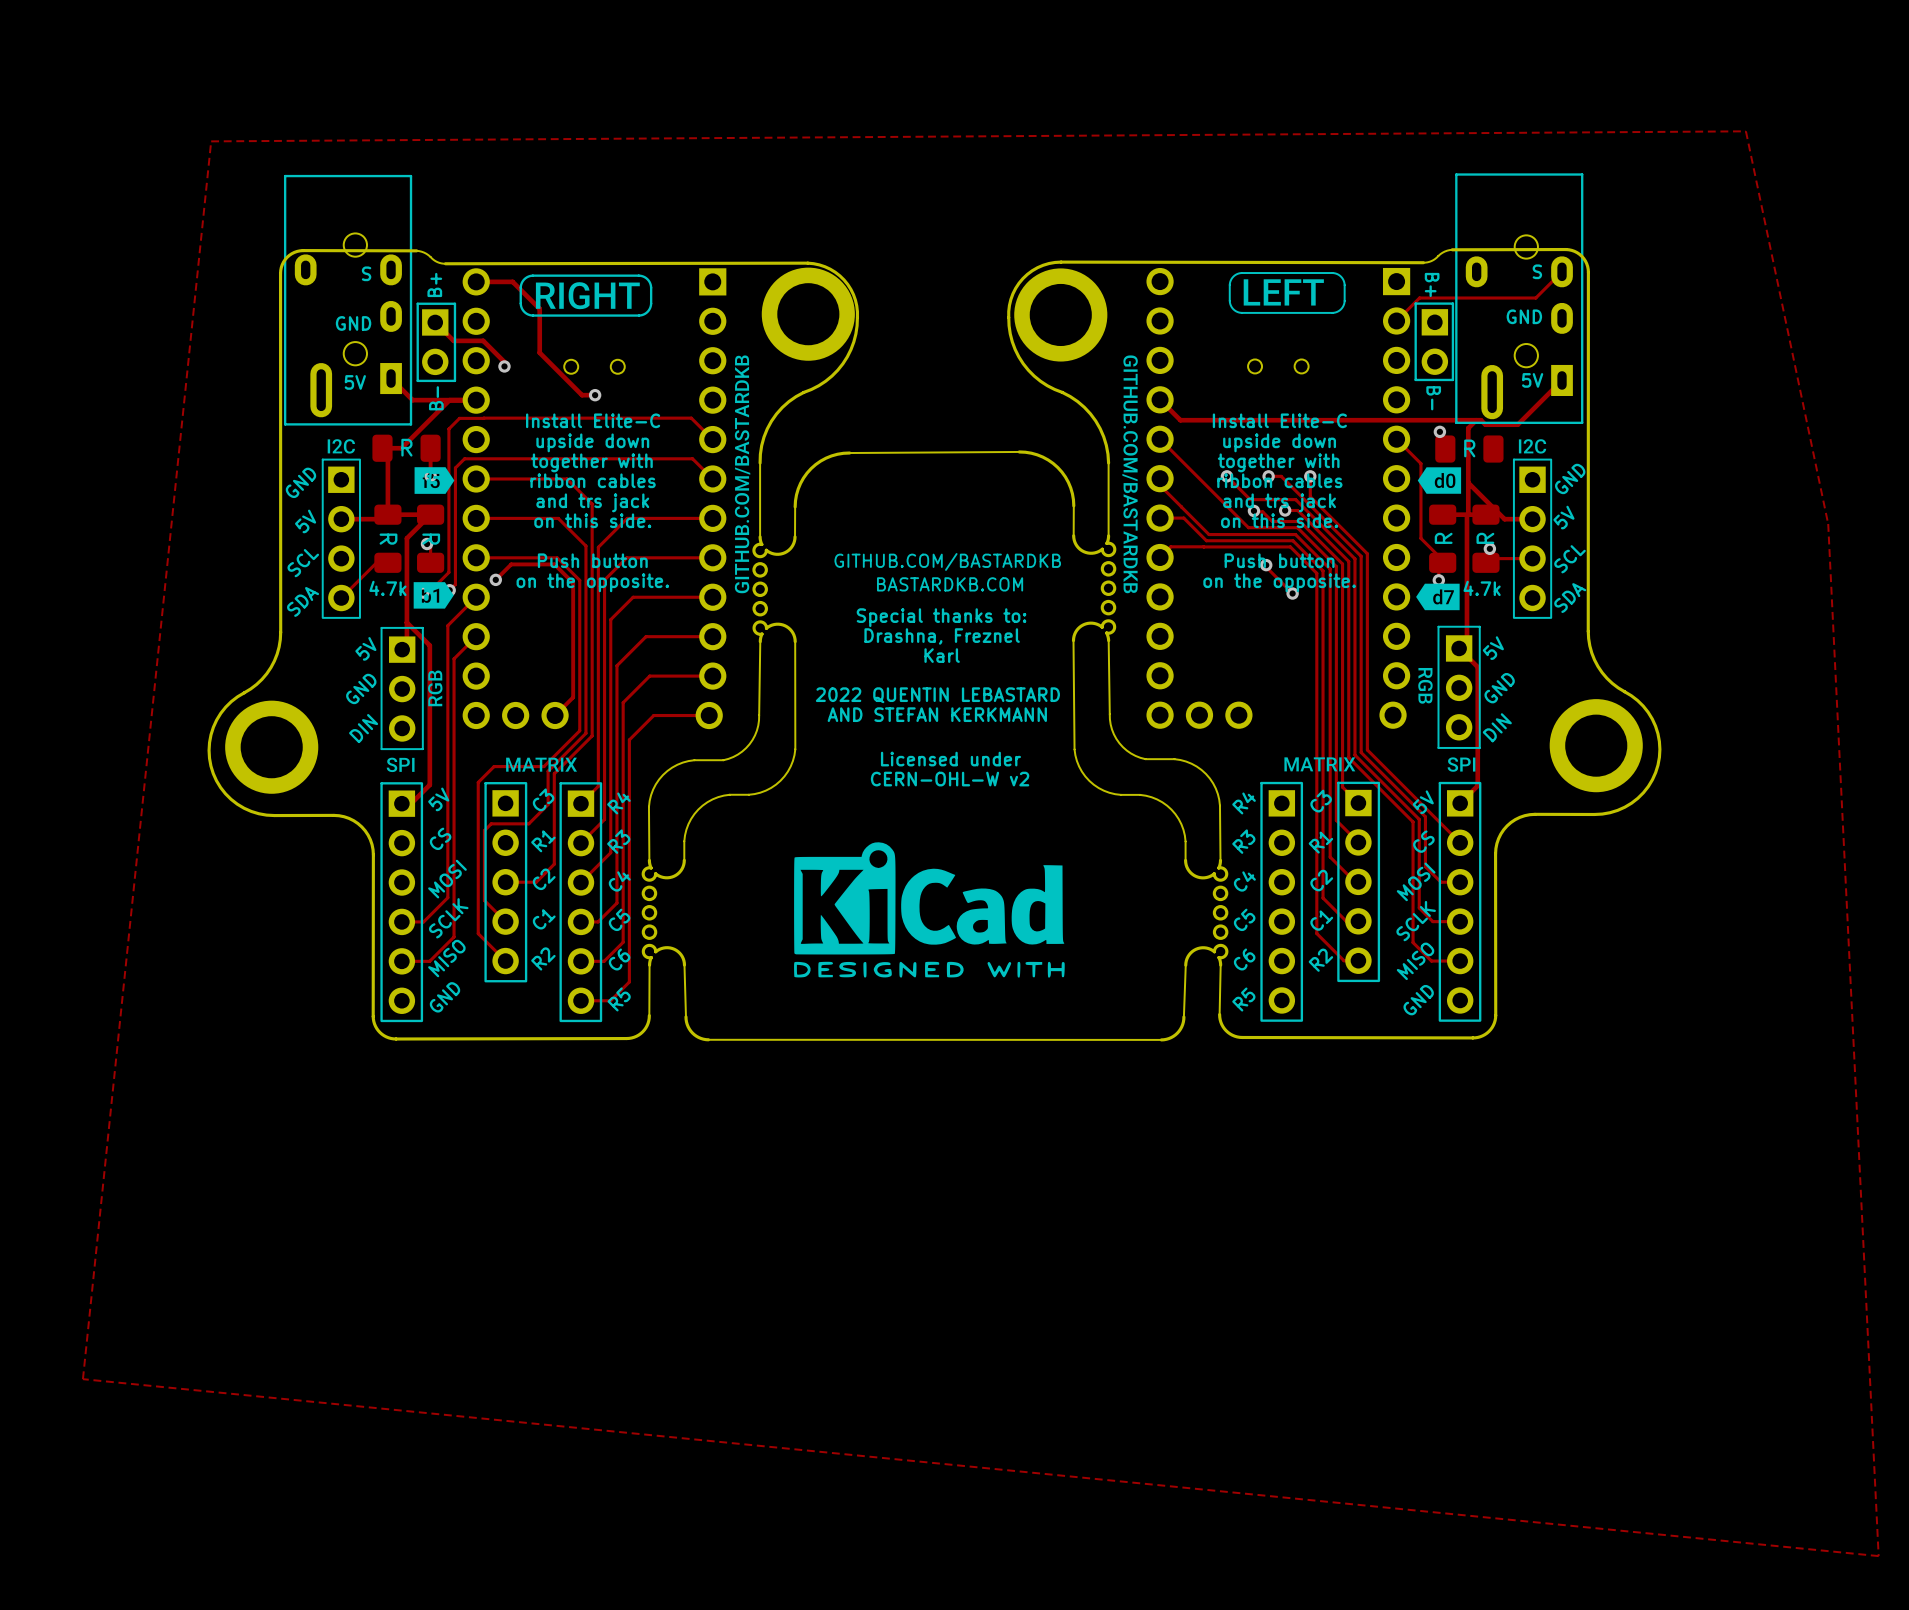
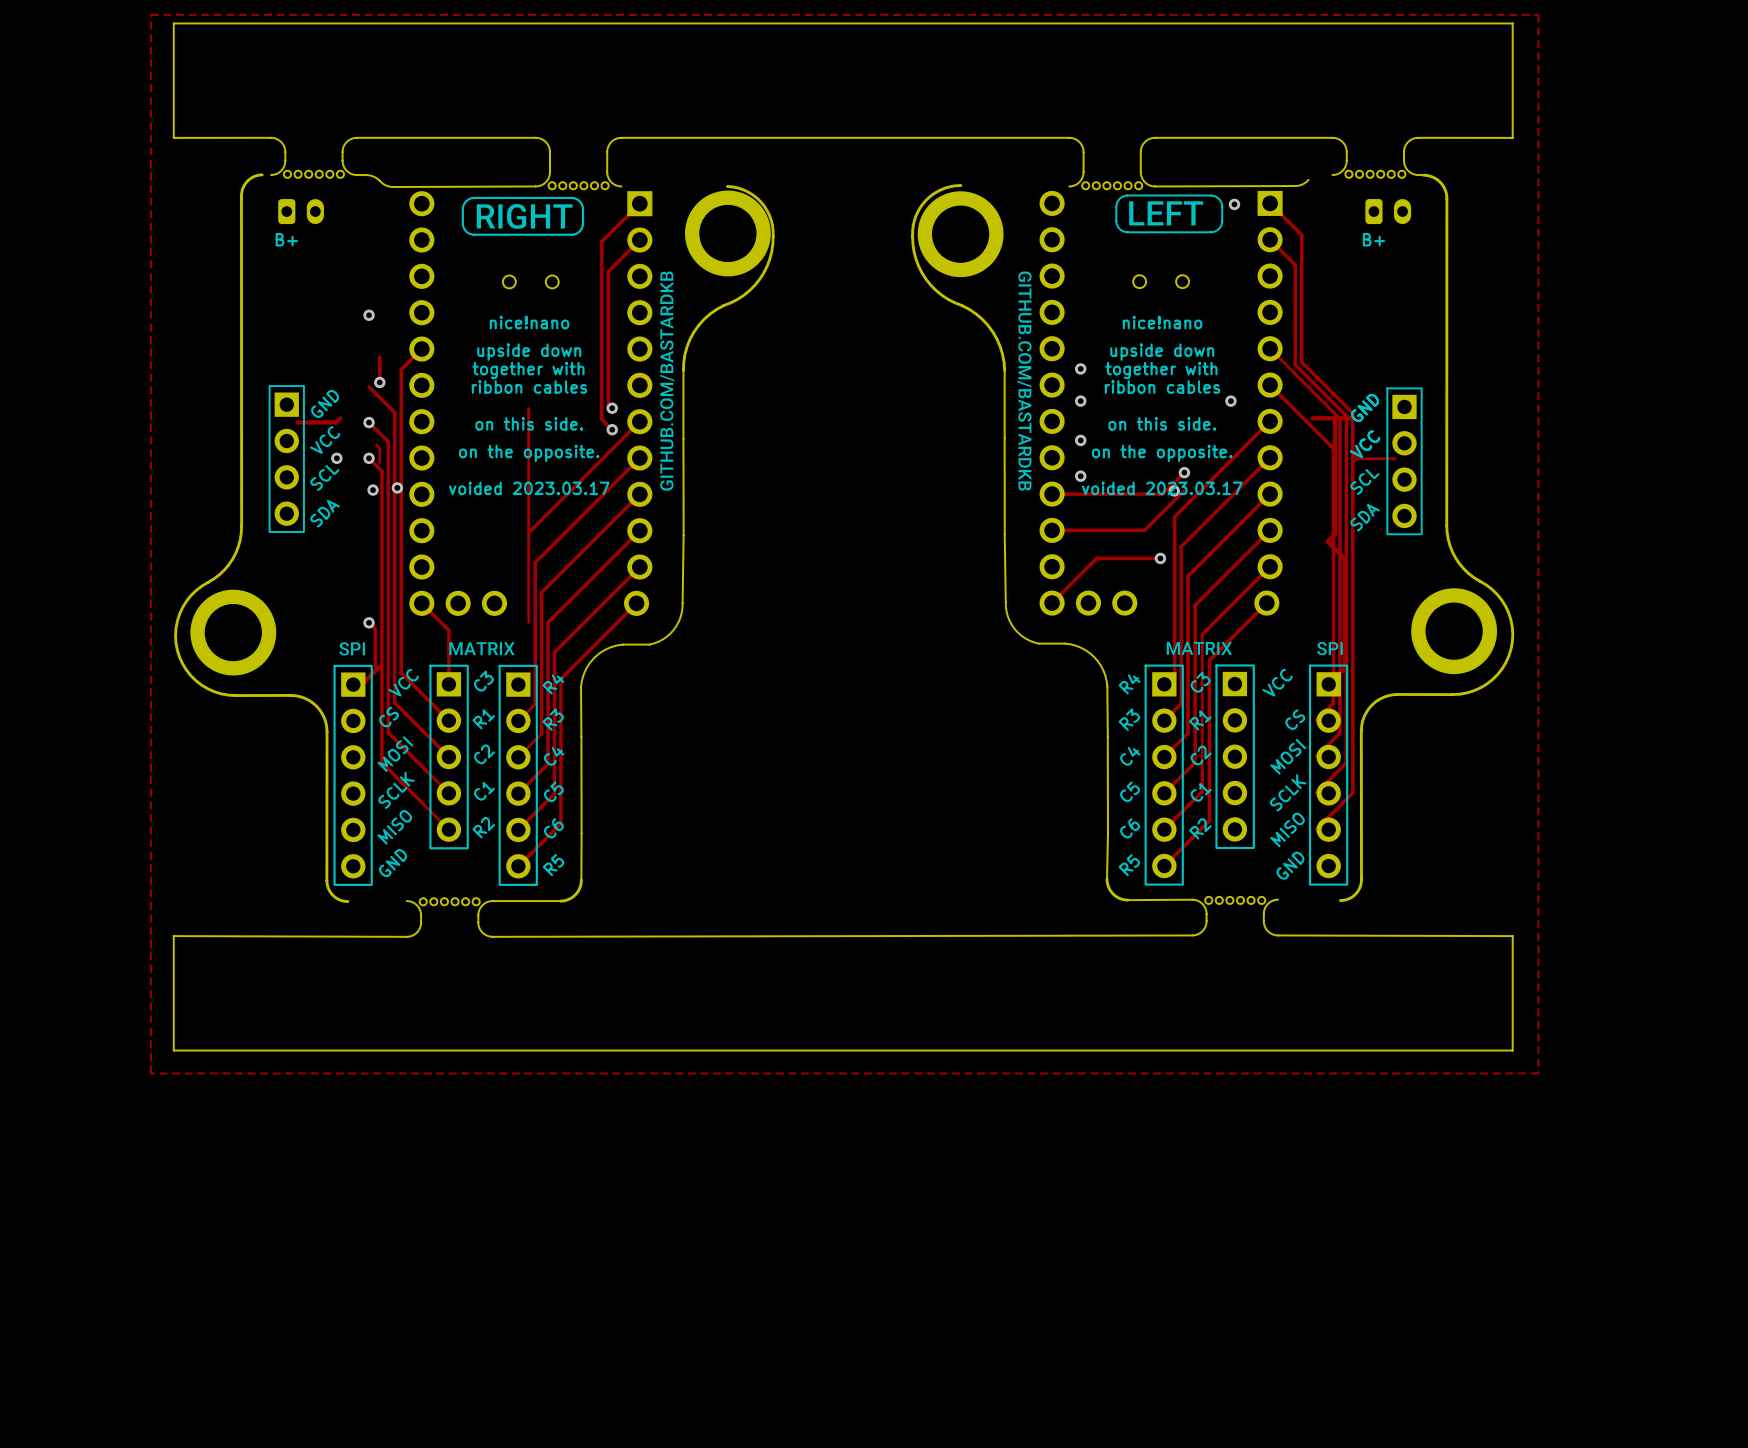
zone outline: (1745, 131) (1828, 523) (1878, 1556) (82, 1379) (211, 141) (1745, 131) -> (150, 14) (150, 1073) (1538, 1073) (1538, 14) (150, 14)
line: (1456, 174) (1456, 422) (1582, 422) (1582, 174) (1456, 174) -> none
line: (285, 176) (285, 424) (411, 424) (411, 176) (285, 176) -> none
board edge: none -> (271, 137) (173, 137) (173, 23) (1512, 23) (1512, 137) (1418, 137)
board edge: none -> (535, 137) (356, 137)
board edge: none -> (1069, 137) (621, 137)
board edge: none -> (1332, 137) (1155, 137)
part: none -> (313, 157)
part: none -> (1375, 157)
part: none -> (578, 163)
part: none -> (1112, 163)
board edge: (303, 250) (416, 250) -> (356, 175) (366, 175)
board edge: (1438, 255) (1452, 249) (1568, 249) (1577, 252) (1583, 258) (1587, 266) (1588, 276) -> (1418, 175) (1429, 176) (1437, 180) (1445, 189) (1446, 198)
board edge: (1061, 262) (1423, 262) -> (1155, 186) (1294, 186)
board edge: (807, 263) (445, 263) -> (535, 186) (393, 187)
text: S (1537, 271) -> none
track: (1562, 271) (1535, 298) (1419, 298) (1396, 320) -> (1316, 792) (1346, 762) (1346, 415) (1295, 364) (1295, 264) (1270, 239)
text: S (366, 273) -> none
track: (476, 281) (512, 281) (539, 308) (539, 352) (582, 395) (595, 395) -> none
track: none -> (639, 203) (601, 241) (601, 419) (612, 429)
track: none -> (1270, 203) (1301, 235) (1301, 362) (1352, 413) (1352, 792) (1316, 828)
via: none -> (1234, 204)
text rotation: 0° (434, 284) -> 90° clockwise (286, 239)
text position: B+ (434, 284) -> B+ (286, 239)
text rotation: 0° (1432, 284) -> 90° counterclockwise (1373, 239)
text position: B+ (1432, 284) -> B+ (1373, 239)
part: none -> (301, 211)
part: none -> (1388, 211)
line: (417, 303) (454, 303) (454, 380) (417, 380) (417, 303) -> none
line: (1415, 303) (1452, 303) (1452, 379) (1415, 379) (1415, 303) -> none
text: GND (1524, 316) -> none
track: none -> (639, 240) (608, 271) (608, 404) (612, 408)
track: (435, 322) (453, 340) (483, 340) (504, 362) (504, 366) -> none
text: GND (353, 323) -> none
part: (348, 325) -> none
part: (1519, 327) -> none
part: (435, 342) -> none
part: (1434, 342) -> none
via: (504, 366) -> none
track: (391, 378) (412, 400) (476, 400) -> none
text: 5V (1532, 380) -> none
track: (1562, 380) (1517, 424) (1485, 424) (1480, 420) (1180, 420) (1160, 399) -> none
text: 5V (355, 382) -> none
via: (595, 395) -> none
text: B- (436, 398) -> none
text: B- (1433, 398) -> none
track: (449, 400) (401, 448) (382, 448) (387, 453) (387, 514) (430, 514) (406, 538) (406, 644) (402, 649) -> none
via: none -> (369, 315)
text: Install Elite-C (593, 420) -> nice!nano (529, 322)
text: Install Elite-C (1279, 420) -> nice!nano (1162, 322)
track: (1476, 420) (1468, 428) (1468, 514) -> none
via: (1439, 431) -> none
drawing: [327, 439, 356, 454] -> none
track: none -> (421, 349) (401, 369) (401, 673) (448, 720)
track: (712, 439) (691, 418) (459, 418) (448, 429) (448, 572) (428, 592) (423, 592) -> none
track: (1160, 439) (1248, 527) (1297, 527) (1336, 566) (1336, 820) (1358, 842) -> none
drawing: [1518, 439, 1547, 454] -> none
part: (406, 448) -> none
part: (1469, 449) -> none
via: none -> (1080, 368)
track: (1420, 463) (1420, 538) (1442, 560) (1438, 566) (1438, 580) -> (1292, 371) (1339, 418) (1339, 733) (1316, 756)
drawing: [414, 467, 455, 494] -> none
drawing: [1417, 467, 1462, 494] -> none
track: (1226, 476) (1250, 499) (1295, 499) (1354, 558) (1354, 755) (1419, 819) (1419, 907) (1432, 921) (1460, 921) -> none
via: (1226, 476) -> none
track: (1268, 476) (1281, 476) (1361, 556) (1361, 752) (1425, 816) (1425, 866) (1440, 882) (1460, 882) -> none
via: (1268, 476) -> none
track: (1310, 476) (1310, 496) (1367, 553) (1367, 749) (1460, 842) -> none
via: (1310, 476) -> none
track: (476, 478) (567, 478) (592, 504) -> none
track: (712, 478) (692, 458) (464, 458) (455, 467) (455, 584) (449, 590) -> none
track: (1160, 478) (1160, 485) (1209, 534) (1295, 534) (1330, 569) (1330, 857) (1354, 881) (1358, 881) -> none
track: none -> (1270, 385) (1333, 448) (1333, 703) (1316, 719)
text position: GND (1570, 478) -> GND (1365, 407)
text position: GND (300, 482) -> GND (325, 403)
track: (1468, 482) (1504, 519) (1532, 519) -> none
via: none -> (1080, 401)
via: none -> (1230, 401)
text: and trs jack (592, 502) -> none
text: and trs jack (1279, 502) -> none
via: none -> (612, 408)
track: (1253, 510) (1262, 511) (1272, 521) (1300, 521) (1342, 564) (1342, 787) (1358, 803) -> none
via: (1253, 510) -> none
track: (1285, 510) (1297, 510) (1348, 561) (1348, 757) (1413, 821) (1413, 942) (1431, 961) (1460, 961) -> none
via: (1285, 510) -> none
text: 5V (1563, 517) -> none
track: (476, 518) (558, 518) (585, 546) (585, 733) (548, 771) (548, 804) (528, 823) (491, 823) (484, 830) (484, 900) -> (369, 422) (388, 441) (388, 732) (429, 773)
track: (712, 518) (627, 518) (598, 547) (598, 786) (592, 792) -> (639, 421) (528, 532)
track: (1160, 518) (1183, 518) (1206, 540) (1292, 540) (1323, 570) (1323, 749) -> (1270, 566) (1202, 634)
track: none -> (1270, 421) (1174, 516) (1174, 673) (1164, 684)
via: none -> (369, 422)
text: 5V (305, 521) -> none
via: none -> (612, 429)
board edge: (1108, 535) (1106, 543) (1112, 544) (1114, 548) (1111, 555) (1105, 554) (1102, 549) (1090, 553) (1078, 547) (1073, 537) (1072, 493) (1065, 477) (1048, 460) (1031, 453) (1019, 451) (849, 453) (831, 455) (815, 464) (800, 483) (795, 500) (794, 539) (790, 548) (778, 554) (766, 550) (763, 555) (757, 556) (753, 549) (756, 545) (761, 544) (760, 536) -> none
part position: (341, 538) -> (286, 459)
text: none -> VCC (325, 440)
part: (387, 538) -> none
part: (430, 538) -> none
via: none -> (1080, 440)
part: (1442, 538) -> none
part: (1485, 538) -> none
part position: (1532, 538) -> (1404, 461)
text: none -> VCC (1365, 444)
via: (427, 544) -> none
track: (1203, 546) (1170, 546) (1160, 557) -> none
track: (1203, 546) (1290, 546) (1316, 573) (1316, 933) (1343, 960) (1358, 960) -> none
via: (1489, 548) -> none
track: (476, 557) (557, 557) (579, 580) (579, 730) (543, 766) (494, 766) (478, 782) (478, 933) -> (369, 458) (381, 471) (381, 762) (423, 804)
track: (712, 557) (626, 557) (604, 580) (604, 819) (599, 824) -> (639, 458) (535, 562) (535, 704)
track: none -> (1270, 457) (1181, 546) (1181, 703) (1164, 720)
via: none -> (336, 458)
via: none -> (369, 458)
text position: SCL (1570, 559) -> SCL (1364, 481)
text: Push button (592, 560) -> none
text: Push button (1279, 560) -> none
text: GITHUB.COM/BASTARDKB (947, 561) -> none
round board edge: [1100, 561, 1117, 577] -> none
track: (387, 562) (376, 562) (341, 598) -> none
round board edge: [752, 562, 768, 578] -> none
text position: SCL (303, 563) -> SCL (324, 477)
track: (1266, 565) (1292, 593) -> none
via: (1266, 565) -> none
track: none -> (1184, 472) (1162, 494) (1052, 494)
via: none -> (1184, 472)
via: none -> (1080, 476)
track: (495, 579) (511, 564) (554, 564) (573, 583) (573, 697) (555, 715) -> none
via: (495, 579) -> none
round board edge: [1100, 580, 1117, 596] -> none
via: (1438, 580) -> none
round board edge: [752, 581, 768, 598] -> none
drawing: [413, 582, 454, 609] -> none
text position: on the opposite. (592, 582) -> on the opposite. (529, 453)
text position: on the opposite. (1279, 582) -> on the opposite. (1162, 453)
drawing: [1416, 583, 1460, 611] -> none
text: BASTARDKB.COM (950, 584) -> none
text: 4.7k (387, 588) -> none
text: 4.7k (1482, 588) -> none
text: none -> voided 2023.03.17 (529, 488)
text: none -> voided 2023.03.17 (1162, 488)
track: none -> (1184, 490) (1144, 530) (1052, 530)
track: none -> (1270, 494) (1187, 576) (1187, 733) (1164, 757)
track: (476, 597) (447, 625) (447, 897) (423, 921) (401, 921) -> none
track: (712, 597) (633, 597) (610, 619) (610, 852) (606, 857) -> (639, 494) (541, 592) (541, 734)
text position: SDA (1570, 598) -> SDA (1365, 517)
round board edge: [1100, 599, 1117, 616] -> none
round board edge: [752, 600, 768, 617] -> none
text position: SDA (303, 601) -> SDA (325, 513)
text: Special thanks to: (941, 617) -> none
track: (406, 622) (429, 645) (429, 784) -> none
track: (476, 636) (454, 658) (454, 936) (429, 961) (401, 961) -> none
track: (712, 636) (646, 636) (616, 665) (616, 903) (598, 921) (580, 921) -> (639, 530) (548, 622) (548, 763) (518, 793)
text: Drashna, Freznel (942, 636) -> none
track: none -> (1270, 530) (1195, 605) (1195, 762) (1164, 793)
board edge: (1108, 640) (1106, 632) (1111, 632) (1114, 627) (1113, 623) (1109, 620) (1104, 622) (1102, 627) (1092, 623) (1083, 624) (1078, 628) (1074, 636) (1074, 749) (1079, 766) (1089, 780) (1103, 790) (1115, 794) (1151, 797) (1171, 809) (1183, 829) (1186, 864) (1193, 875) (1204, 877) (1214, 873) (1217, 879) (1223, 879) (1226, 872) (1223, 868) (1218, 868) (1220, 860) -> (1004, 534) (1004, 437)
board edge: (760, 641) (762, 634) (756, 633) (754, 628) (755, 624) (759, 621) (764, 623) (766, 628) (776, 624) (785, 625) (791, 631) (794, 637) (795, 749) (790, 766) (780, 780) (765, 790) (754, 794) (718, 797) (698, 809) (686, 829) (683, 864) (676, 875) (665, 877) (655, 873) (652, 879) (646, 879) (643, 872) (646, 868) (651, 868) (649, 860) -> (683, 535) (683, 438)
text: 5V (365, 648) -> none
text: 5V (1493, 648) -> none
text: Karl (942, 655) -> none
track: none -> (1160, 558) (1096, 558) (1052, 603)
via: none -> (1160, 558)
drawing: [1418, 667, 1433, 704] -> none
drawing: [428, 670, 443, 707] -> none
track: (712, 676) (649, 676) (623, 702) (623, 942) (604, 961) (580, 961) -> (639, 567) (554, 652) (554, 793) (518, 829)
part: (1459, 687) -> none
text: GND (361, 688) -> none
part: (402, 688) -> none
text: GND (1499, 688) -> none
text: 2022 QUENTIN LEBASTARD (937, 695) -> none
text: AND STEFAN KERKMANN (937, 714) -> none
track: none -> (421, 603) (448, 630) (448, 684)
track: (709, 715) (653, 715) (629, 739) (629, 982) (610, 1000) (580, 1000) -> (636, 603) (560, 678) (560, 823) (518, 866)
track: none -> (1266, 603) (1209, 660) (1209, 820) (1164, 866)
text: DIN (1497, 727) -> none
text: DIN (363, 728) -> none
track: (592, 735) (554, 773) (554, 864) (536, 882) (505, 882) -> (369, 386) (394, 412) (394, 702) (448, 757)
track: none -> (369, 622) (375, 629) (375, 671)
via: none -> (369, 622)
text: Licensed under (950, 759) -> none
text: CERN-OHL-W v2 (950, 779) -> none
text: 5V (438, 799) -> none
text: none -> VCC (403, 682)
text: none -> VCC (1277, 682)
text: 5V (1423, 802) -> none
drawing: [794, 842, 1065, 978] -> none
board edge: none -> (581, 736) (581, 833)
round board edge: [641, 885, 658, 902] -> none
round board edge: [1212, 885, 1229, 902] -> none
track: (1323, 898) (1346, 921) (1358, 921) -> (1202, 771) (1202, 791) (1164, 829)
round board edge: [641, 905, 658, 921] -> none
round board edge: [1212, 905, 1229, 921] -> none
round board edge: [641, 924, 658, 940] -> none
round board edge: [1212, 924, 1229, 940] -> none
board edge: (649, 965) (651, 957) (646, 956) (643, 952) (647, 945) (653, 946) (655, 951) (663, 948) (670, 947) (681, 954) (684, 962) (687, 1024) (694, 1034) (705, 1039) (1161, 1039) (1175, 1034) (1182, 1024) (1185, 963) (1189, 954) (1193, 950) (1202, 947) (1214, 951) (1217, 946) (1222, 945) (1226, 952) (1224, 956) (1218, 957) (1220, 965) -> (1107, 736) (1107, 833)
board edge: (1242, 1037) (1472, 1037) -> (1127, 900) (1192, 899)
board edge: (626, 1038) (396, 1038) -> (560, 901) (492, 901)
part: none -> (1235, 916)
part: none -> (449, 917)
board edge: none -> (1192, 935) (492, 936)
board edge: none -> (1278, 935) (1512, 936) (1512, 1050) (173, 1050) (173, 936) (406, 936)

